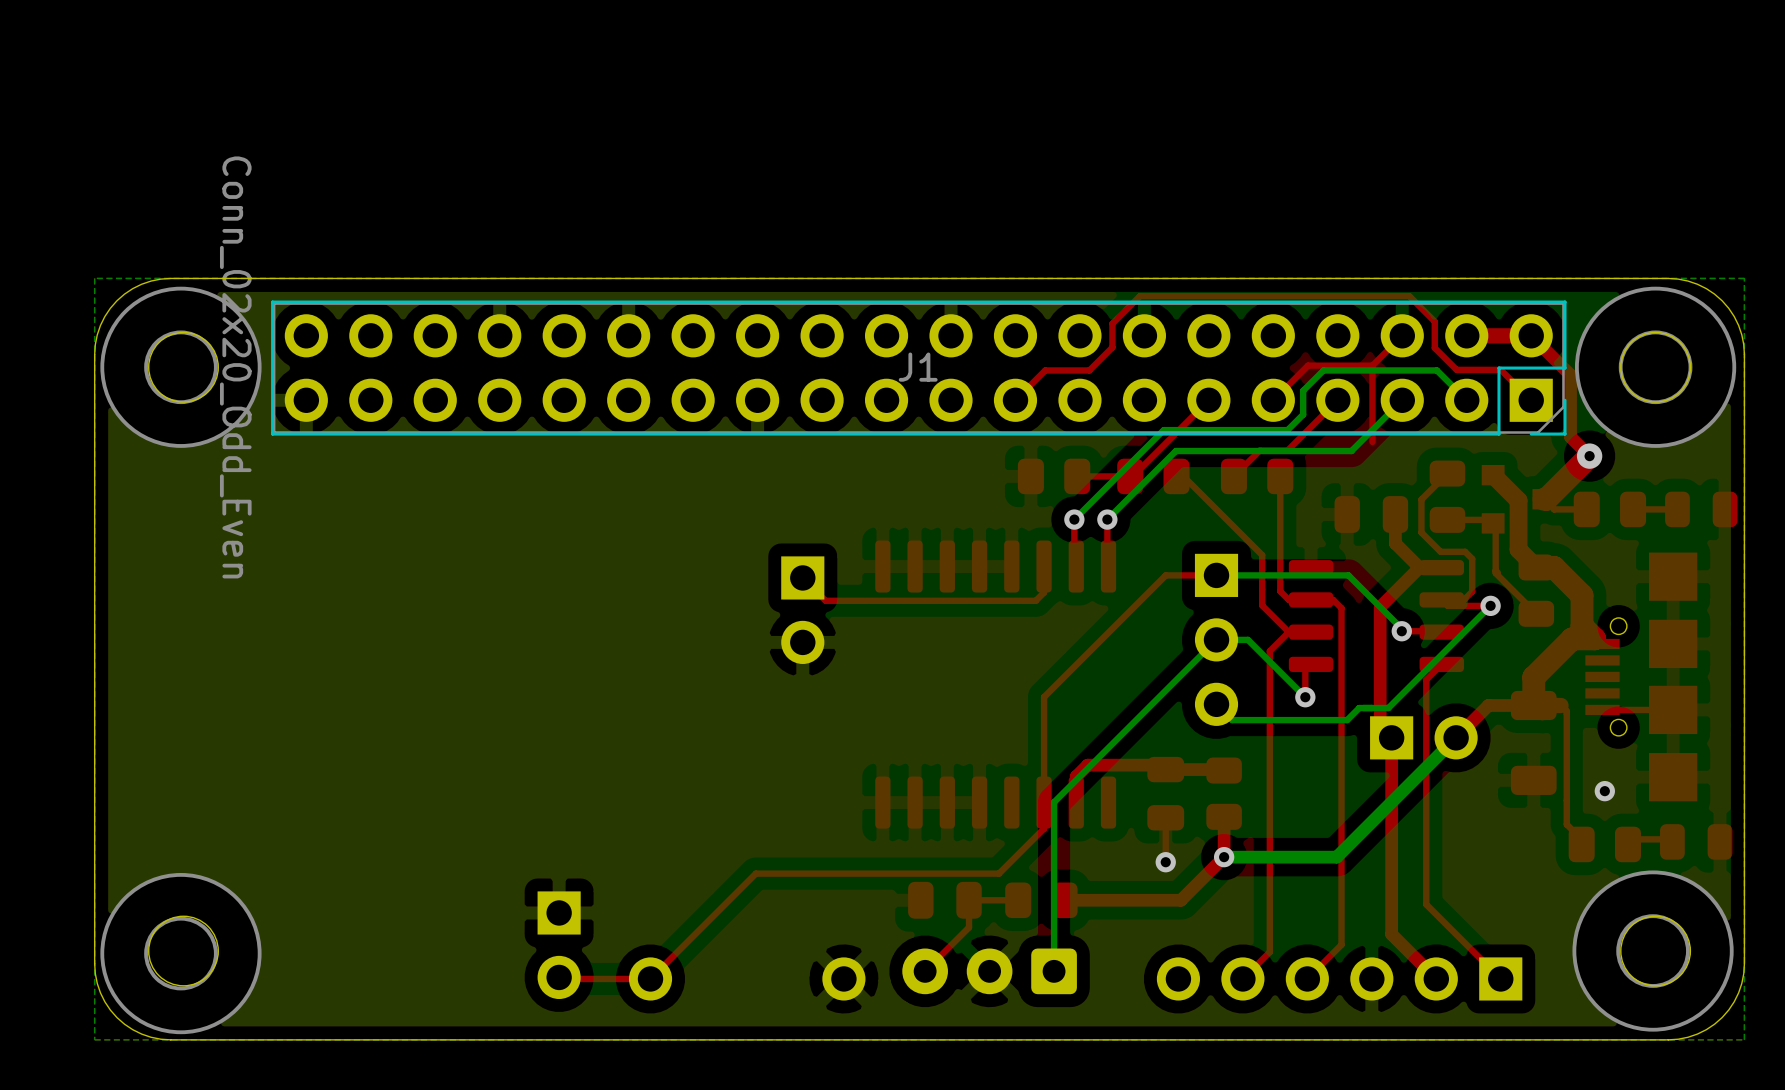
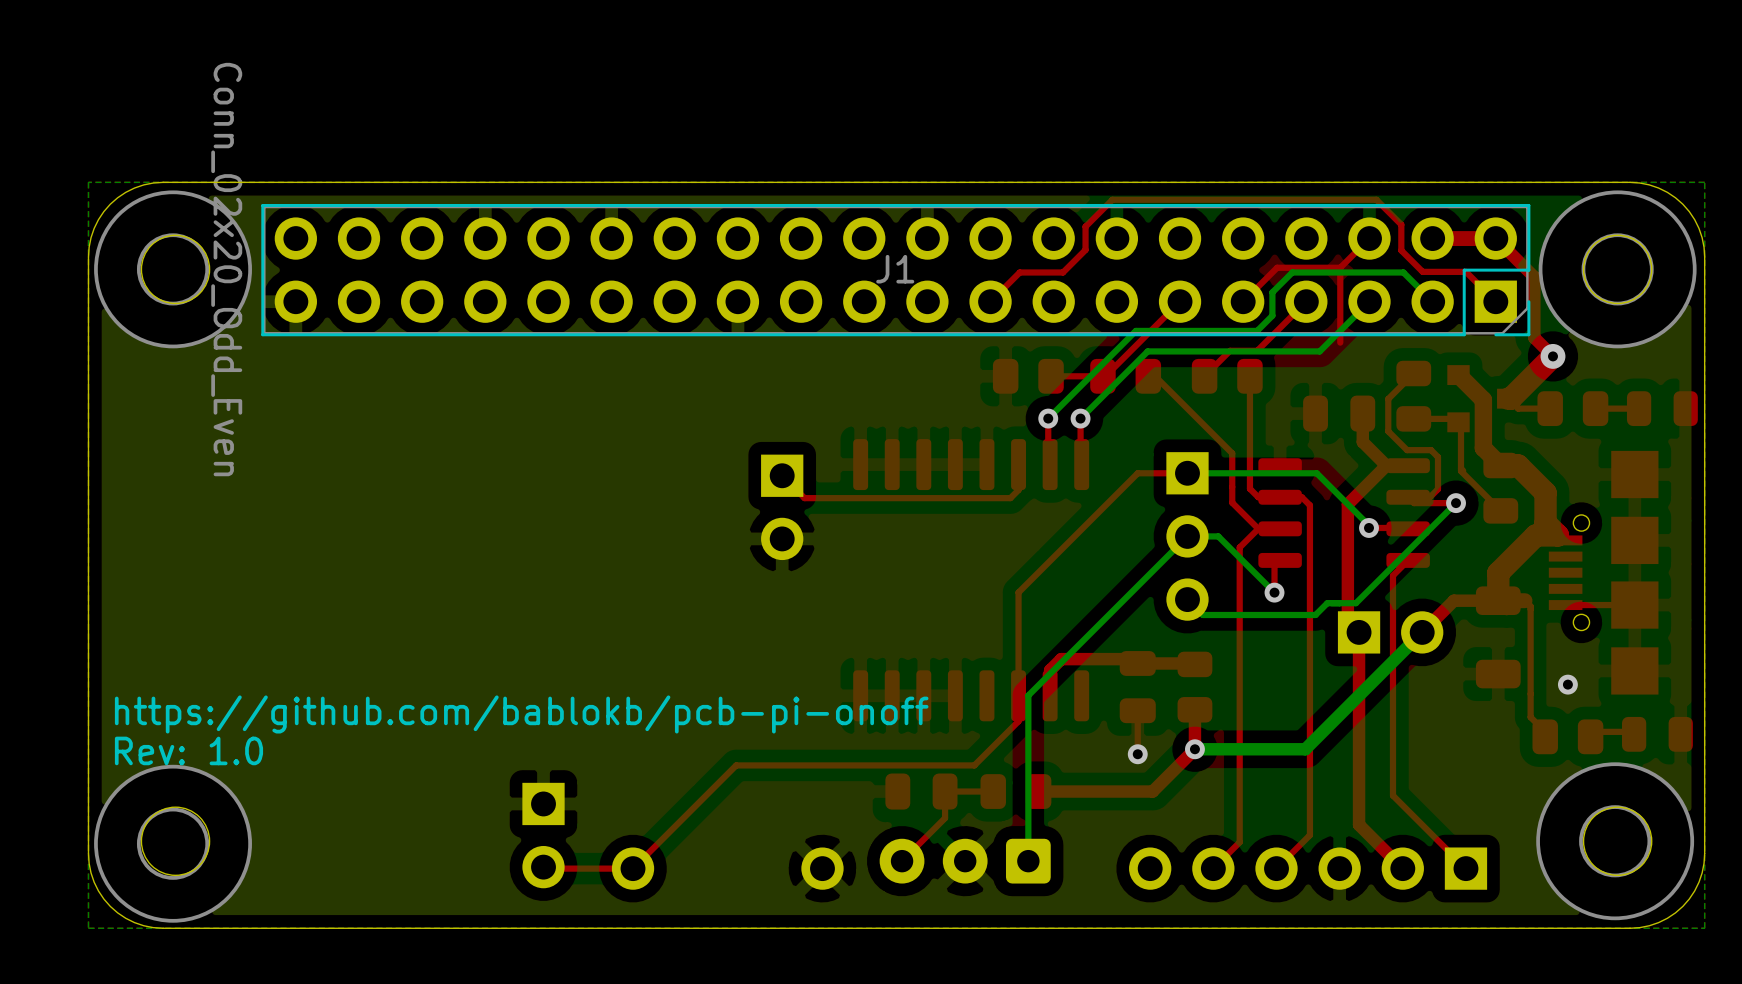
text: none -> https://github.com/bablokb/pcb-pi-onoff (521, 714)
text: none -> Rev: 1.0 (188, 750)

